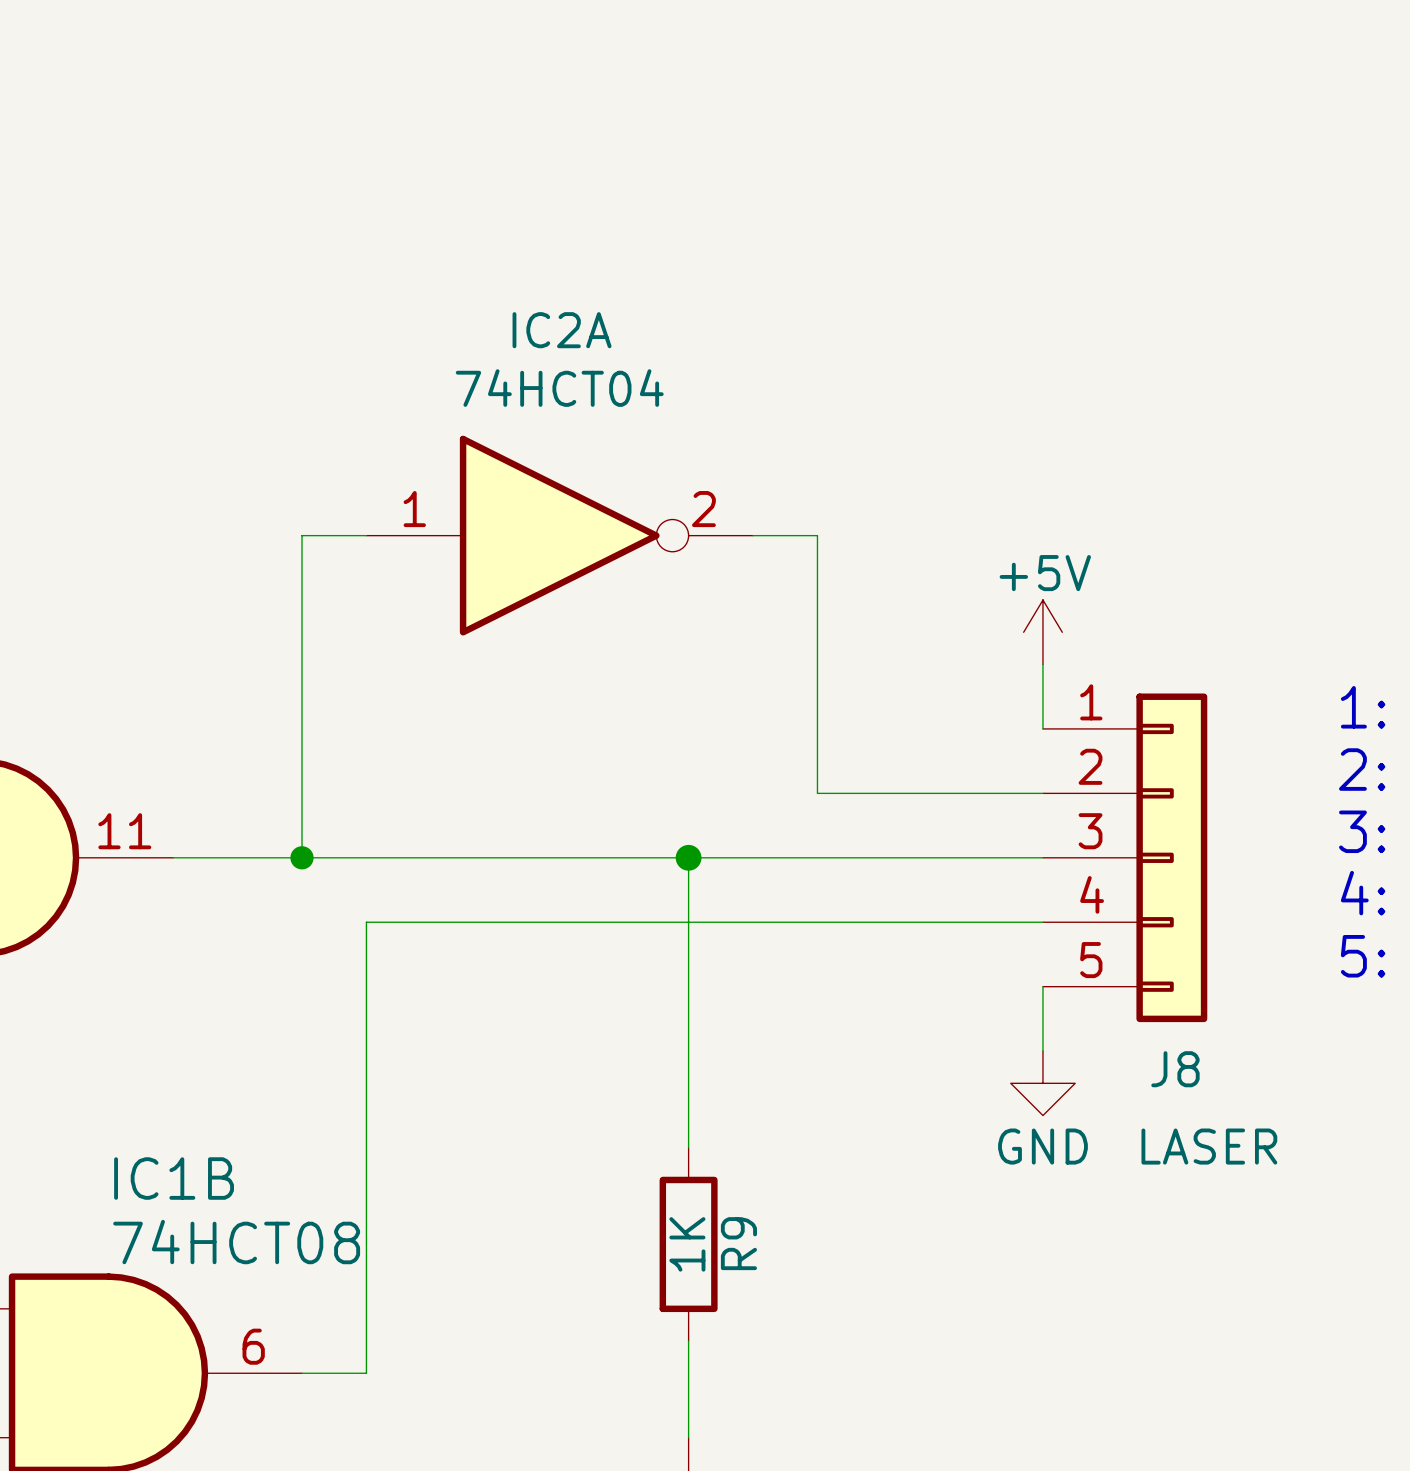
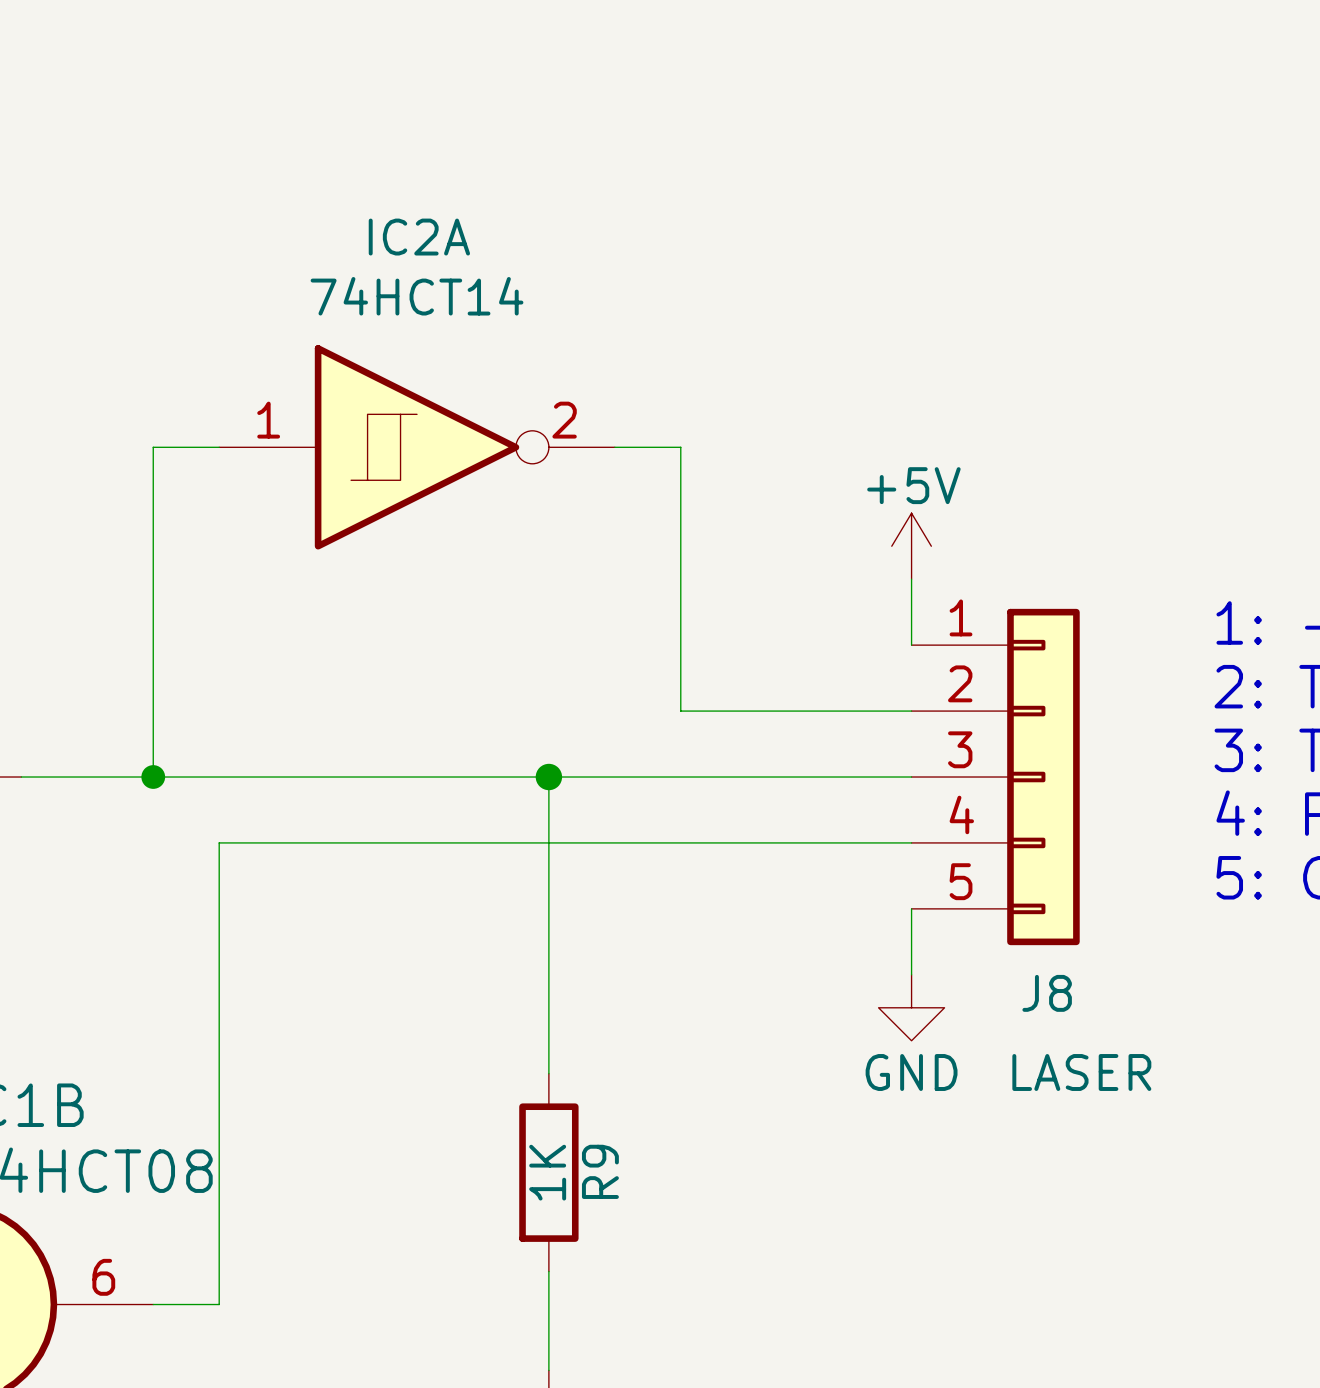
IC2A value: 74HCT04 (559, 388) -> 74HCT14 (417, 296)
IC2A symbol: [366, 435, 754, 636] -> [219, 345, 615, 550]

